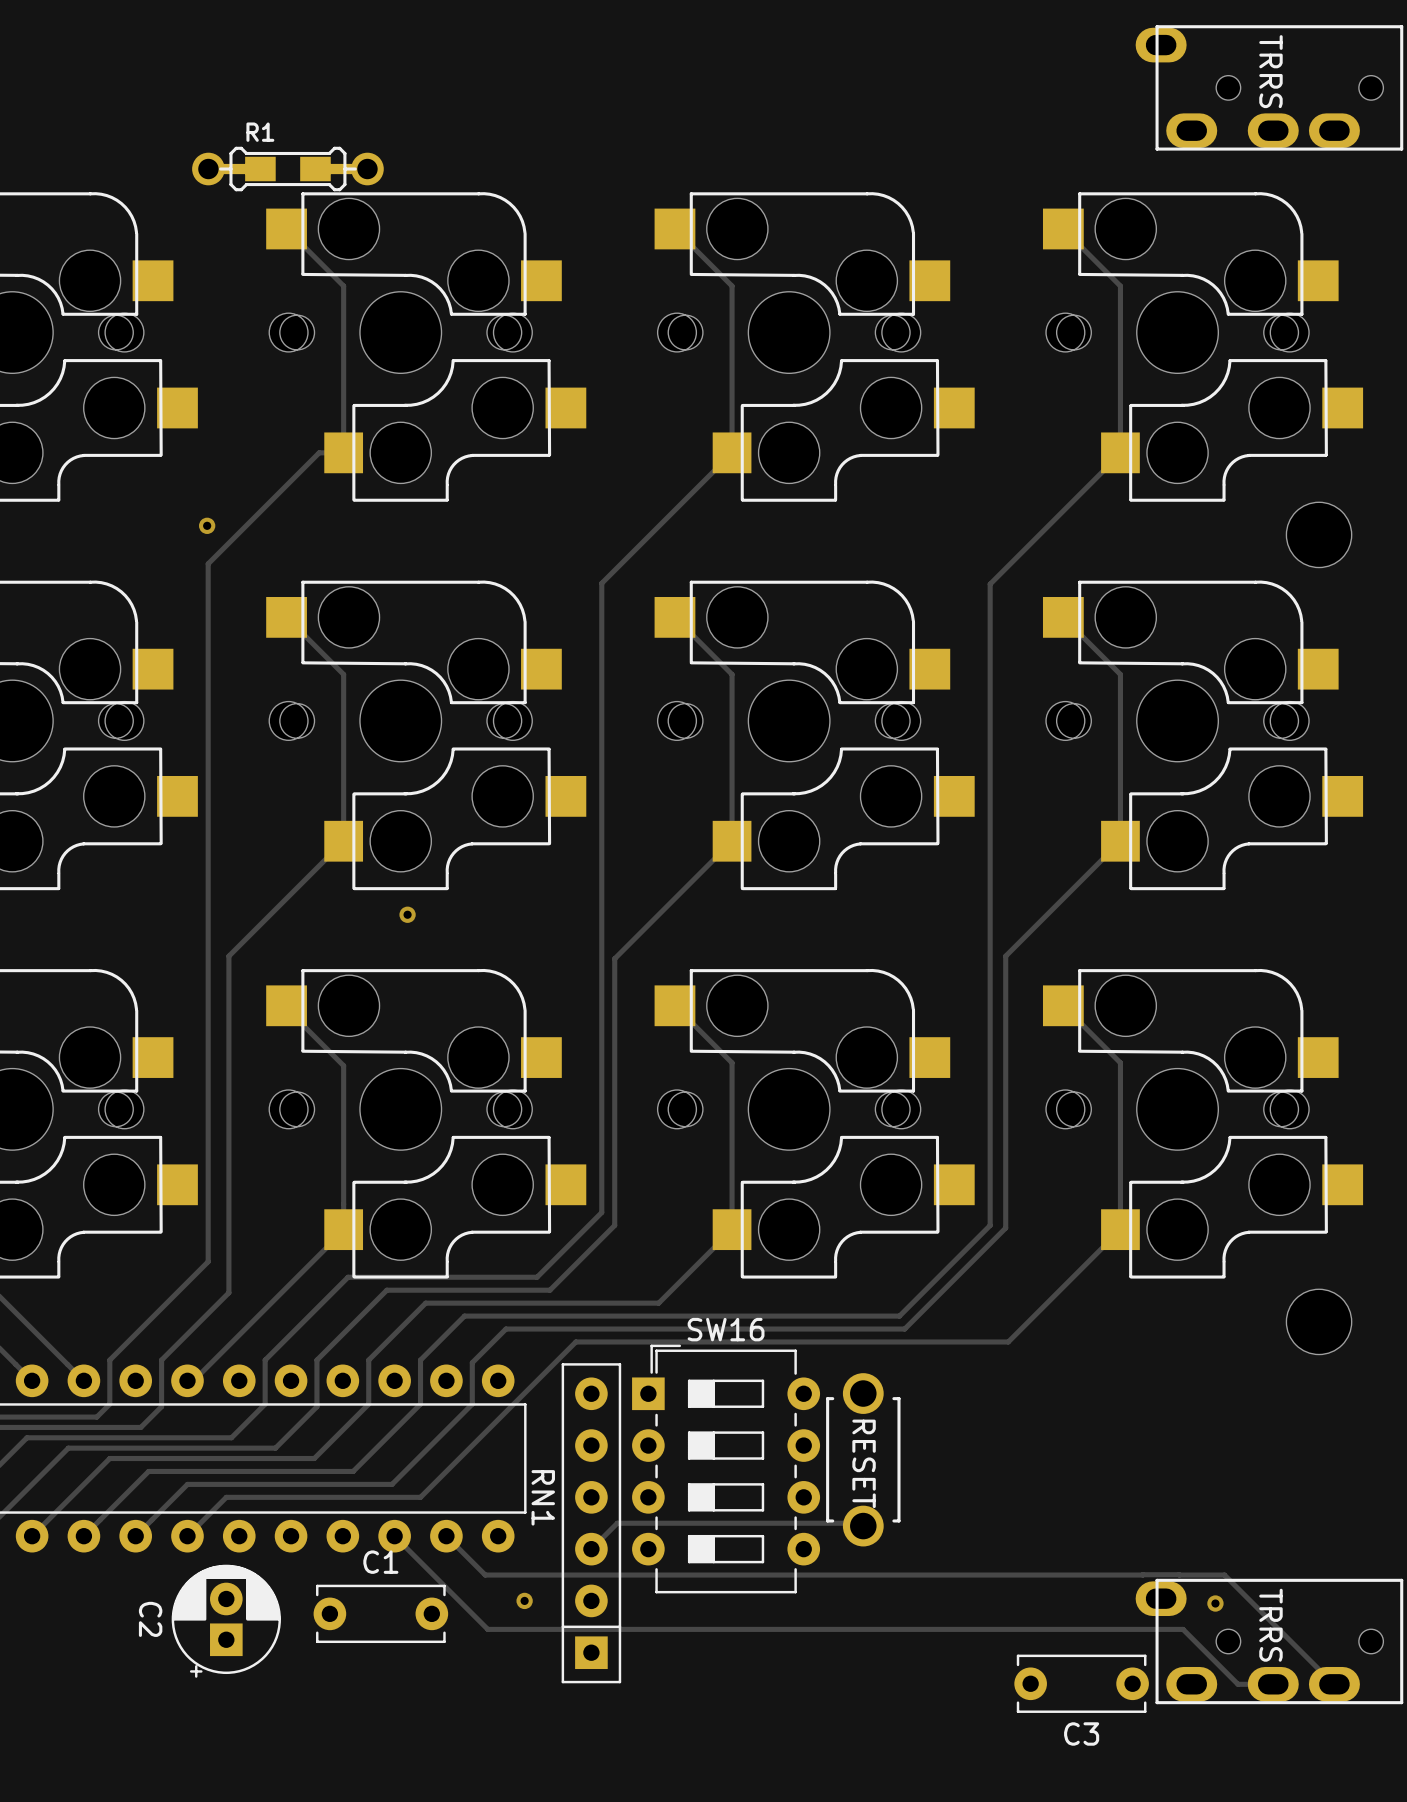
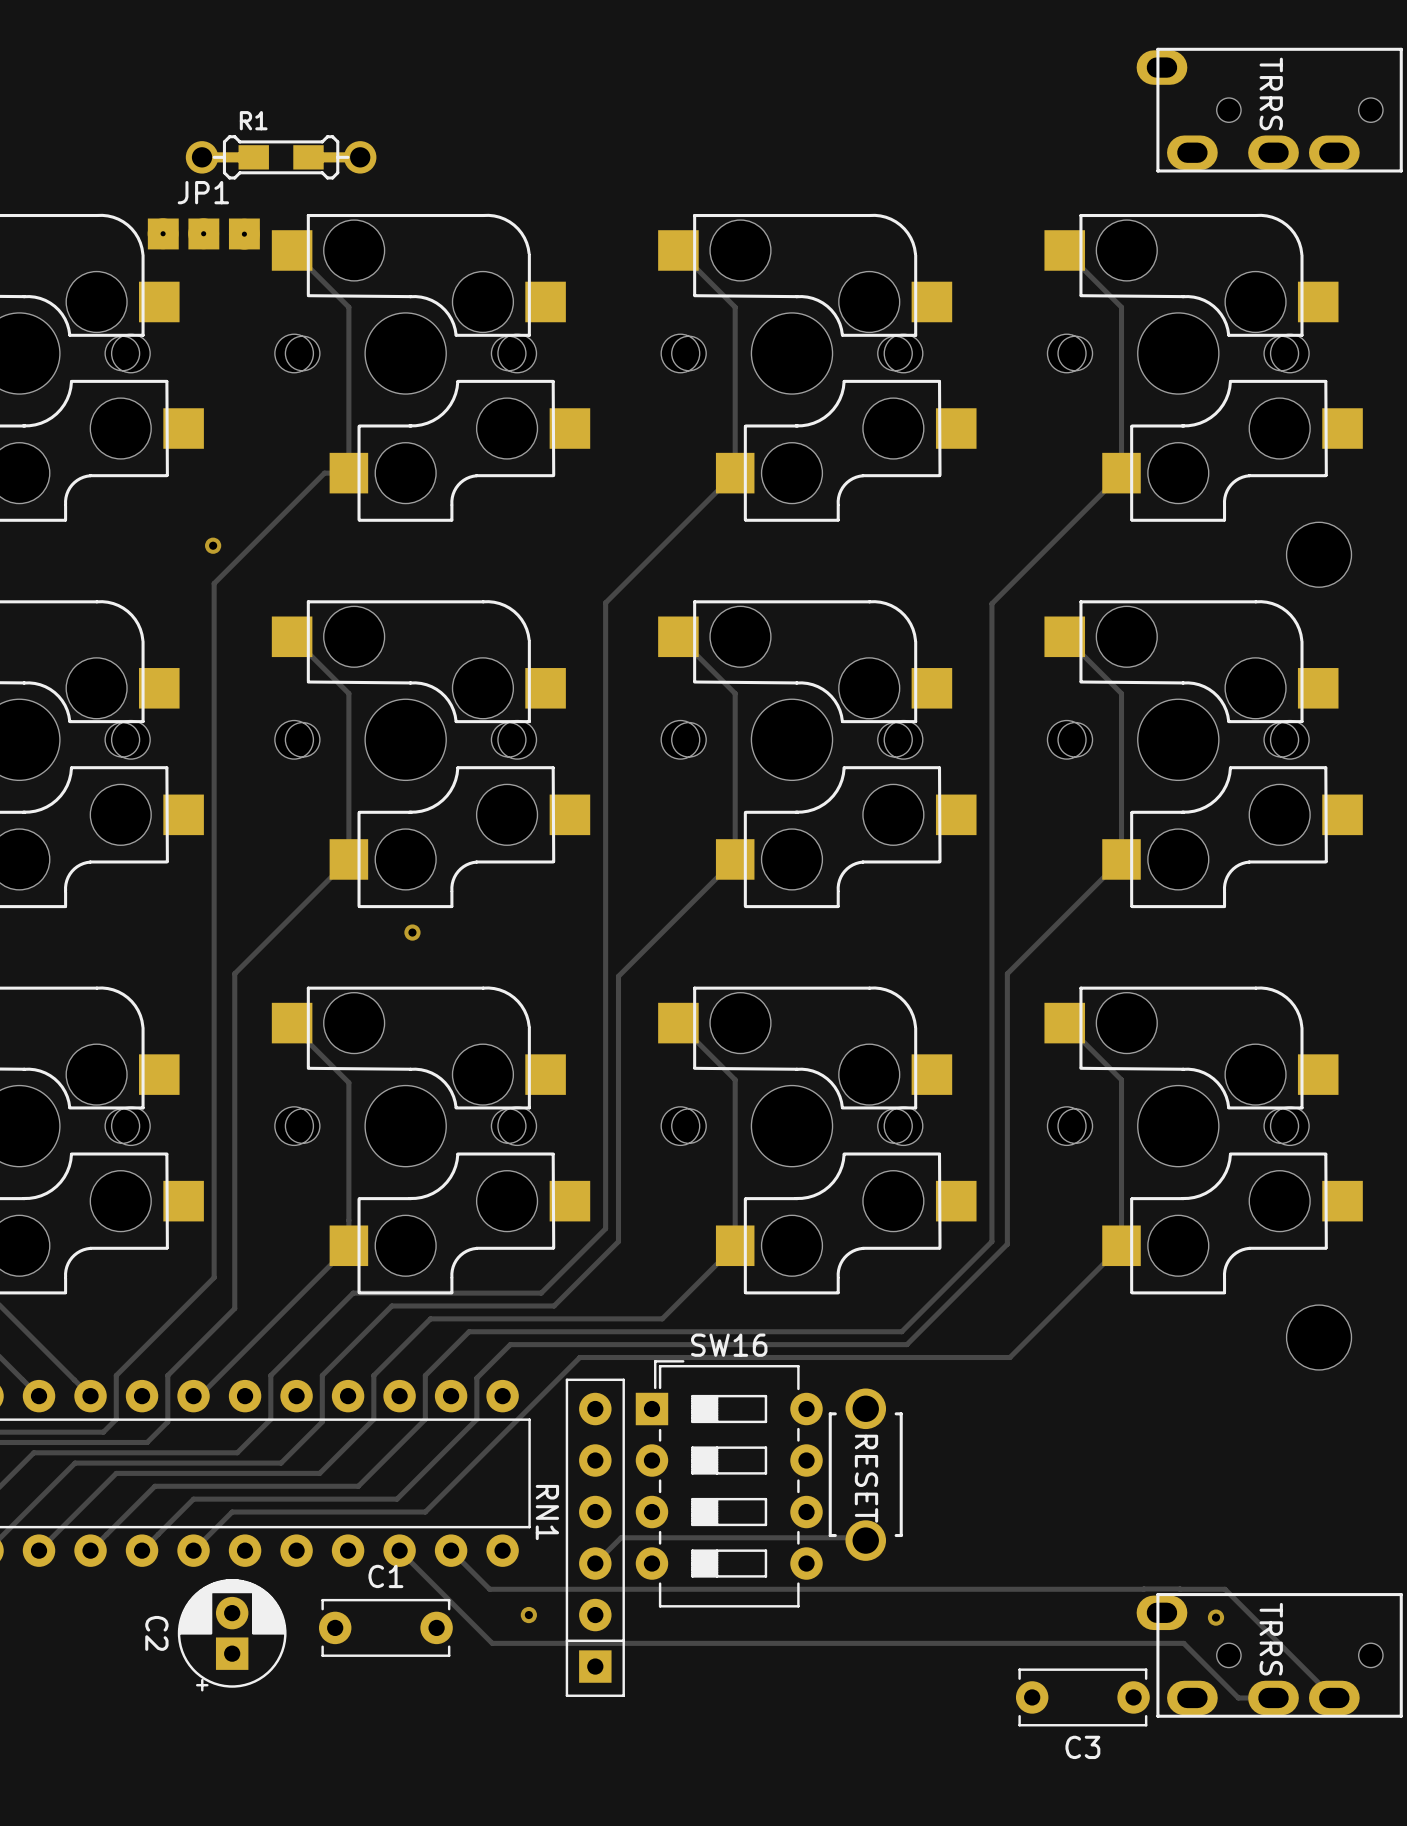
R1 position: (287, 169) -> (281, 157)
JP1: none -> (203, 233)

